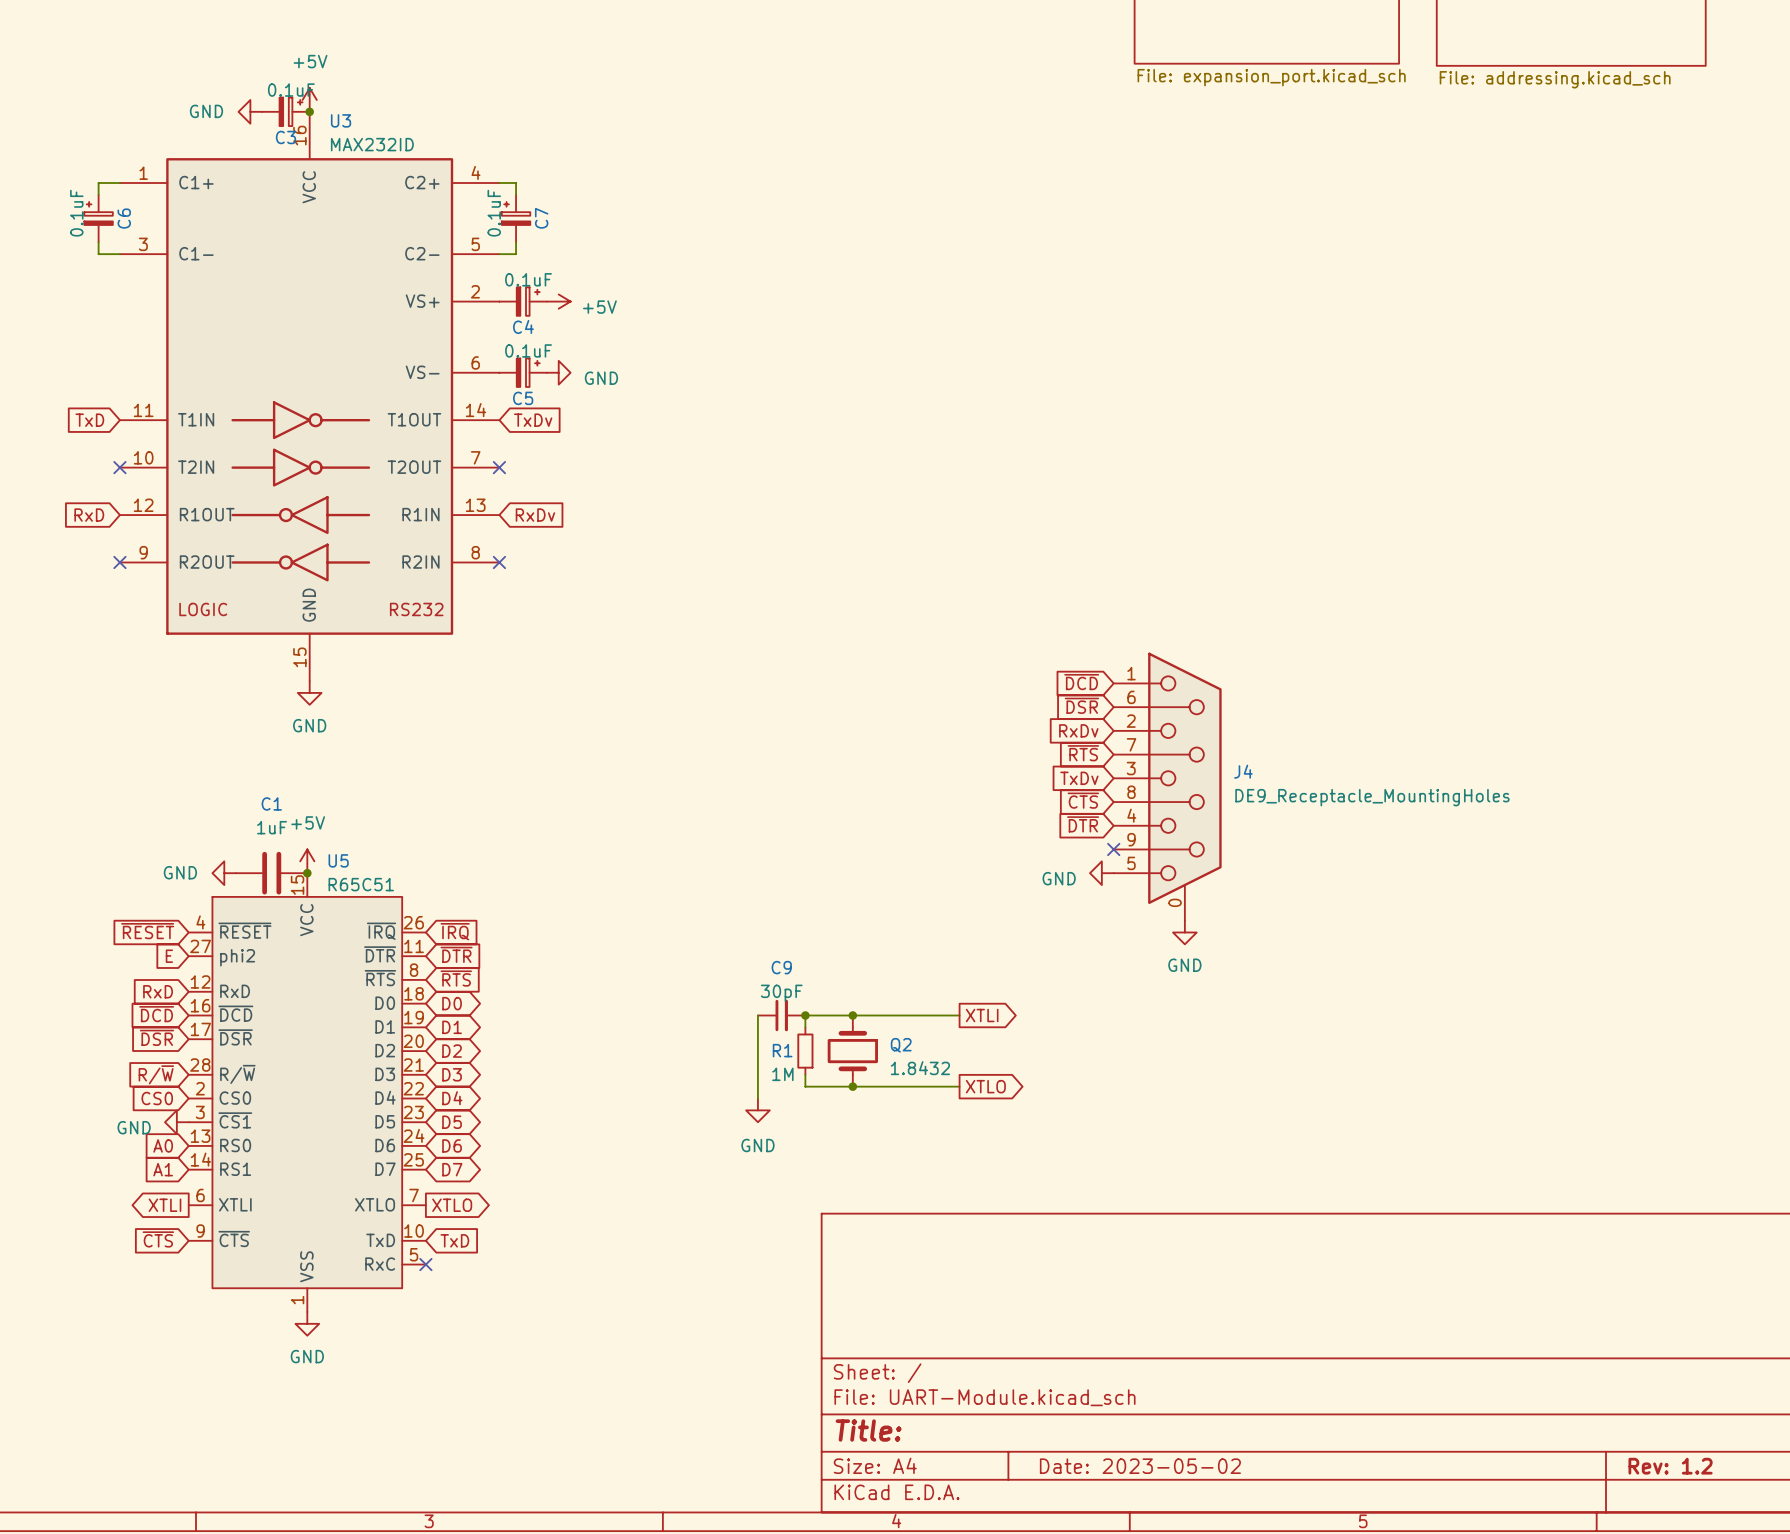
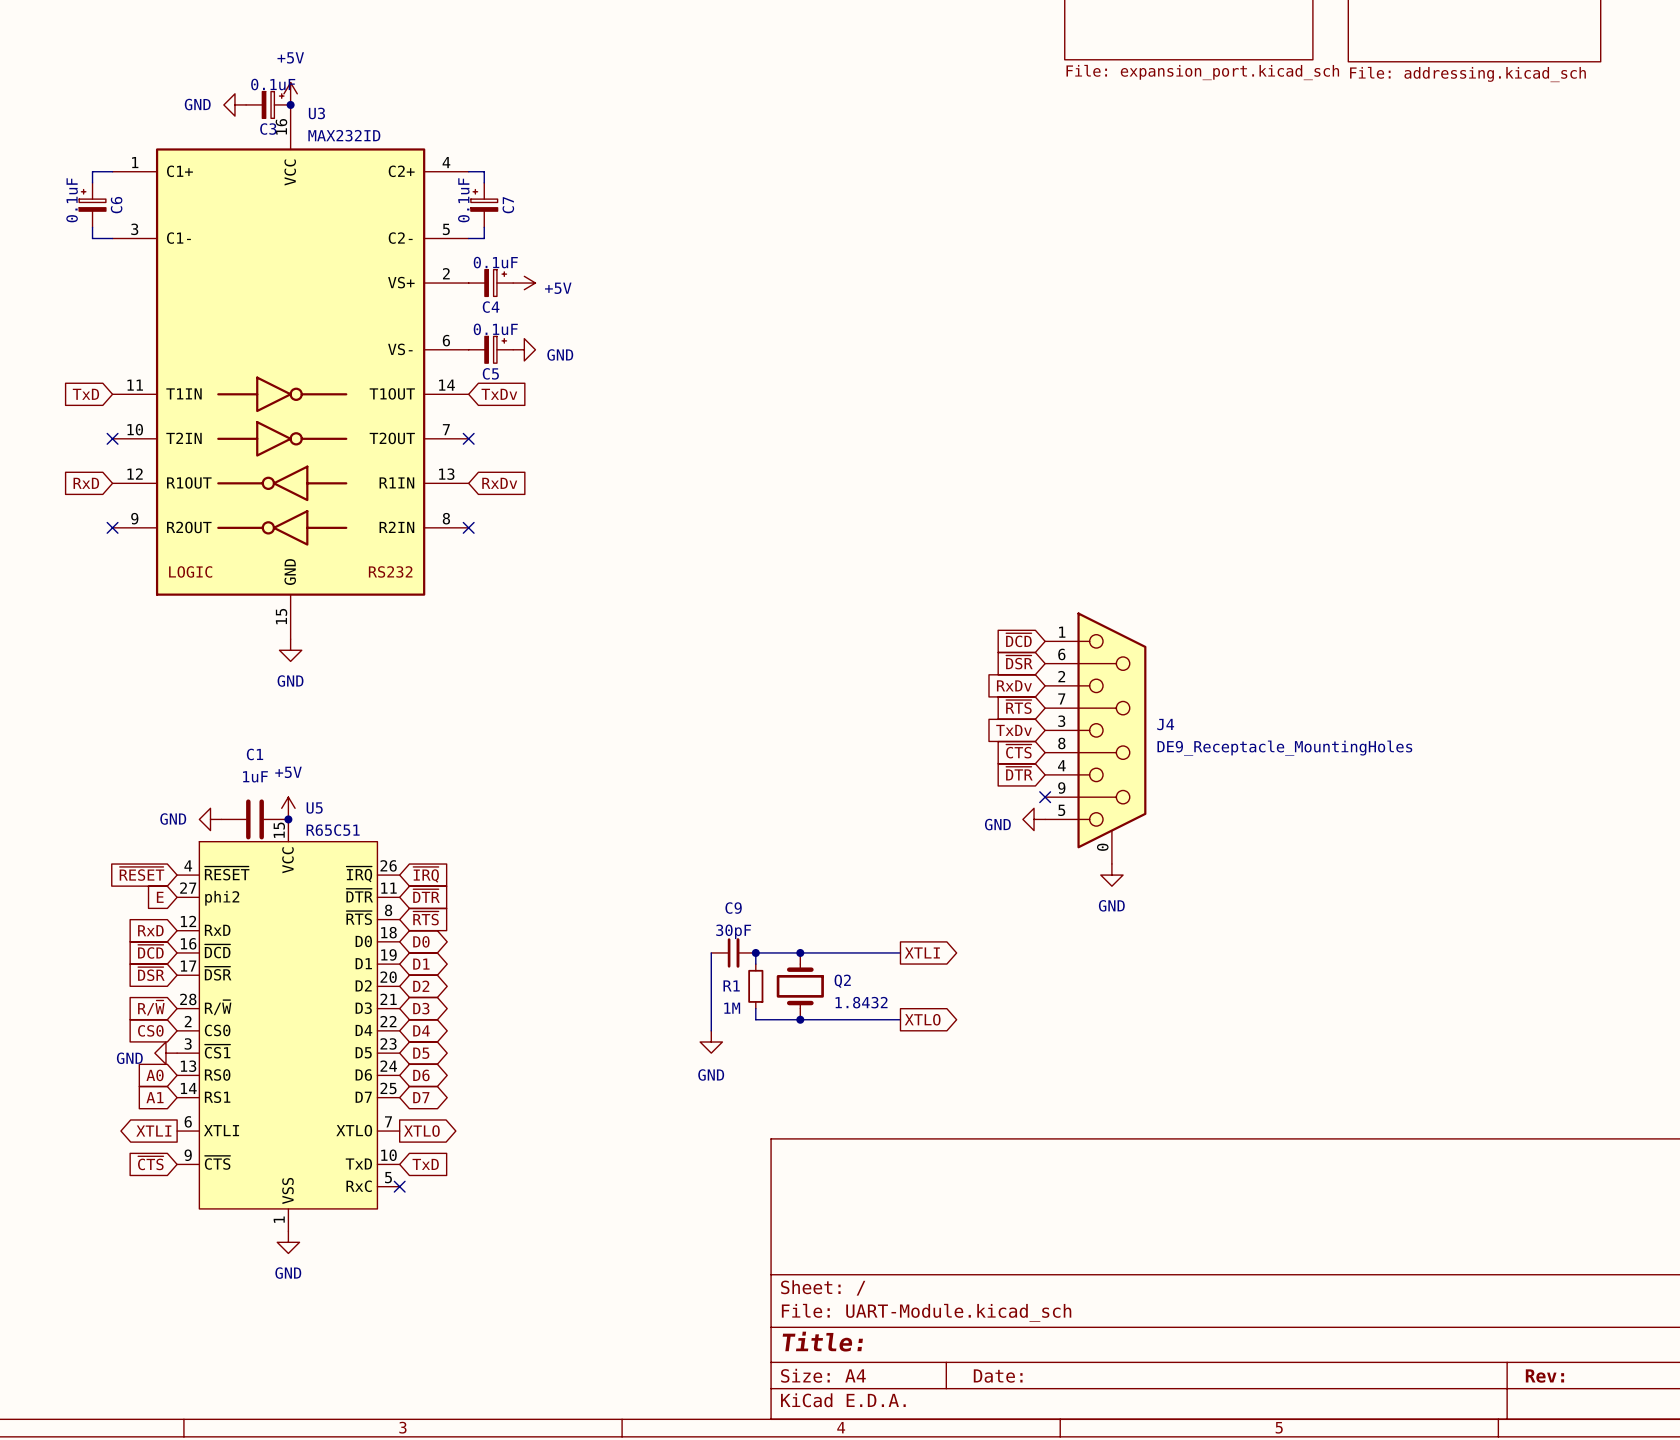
title block: Date: 2023-05-02 (1140, 1466) -> Date: (998, 1376)
title block: Rev: 1.2 (1670, 1466) -> Rev: (1544, 1376)

